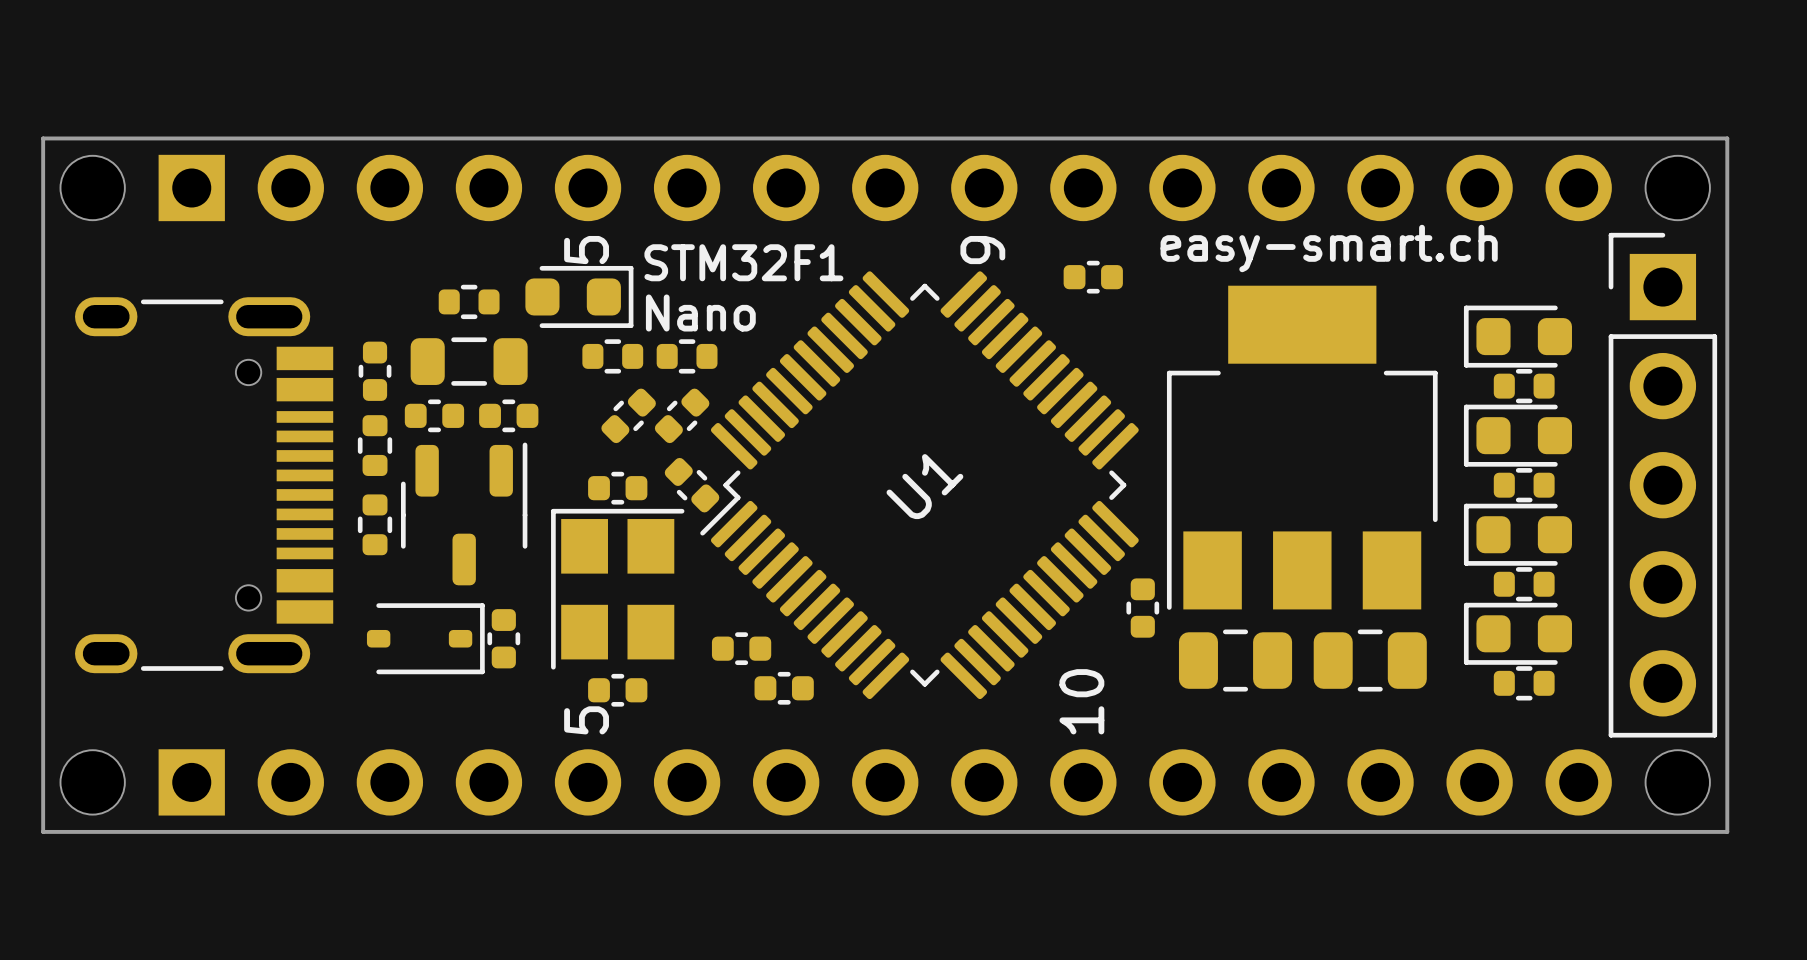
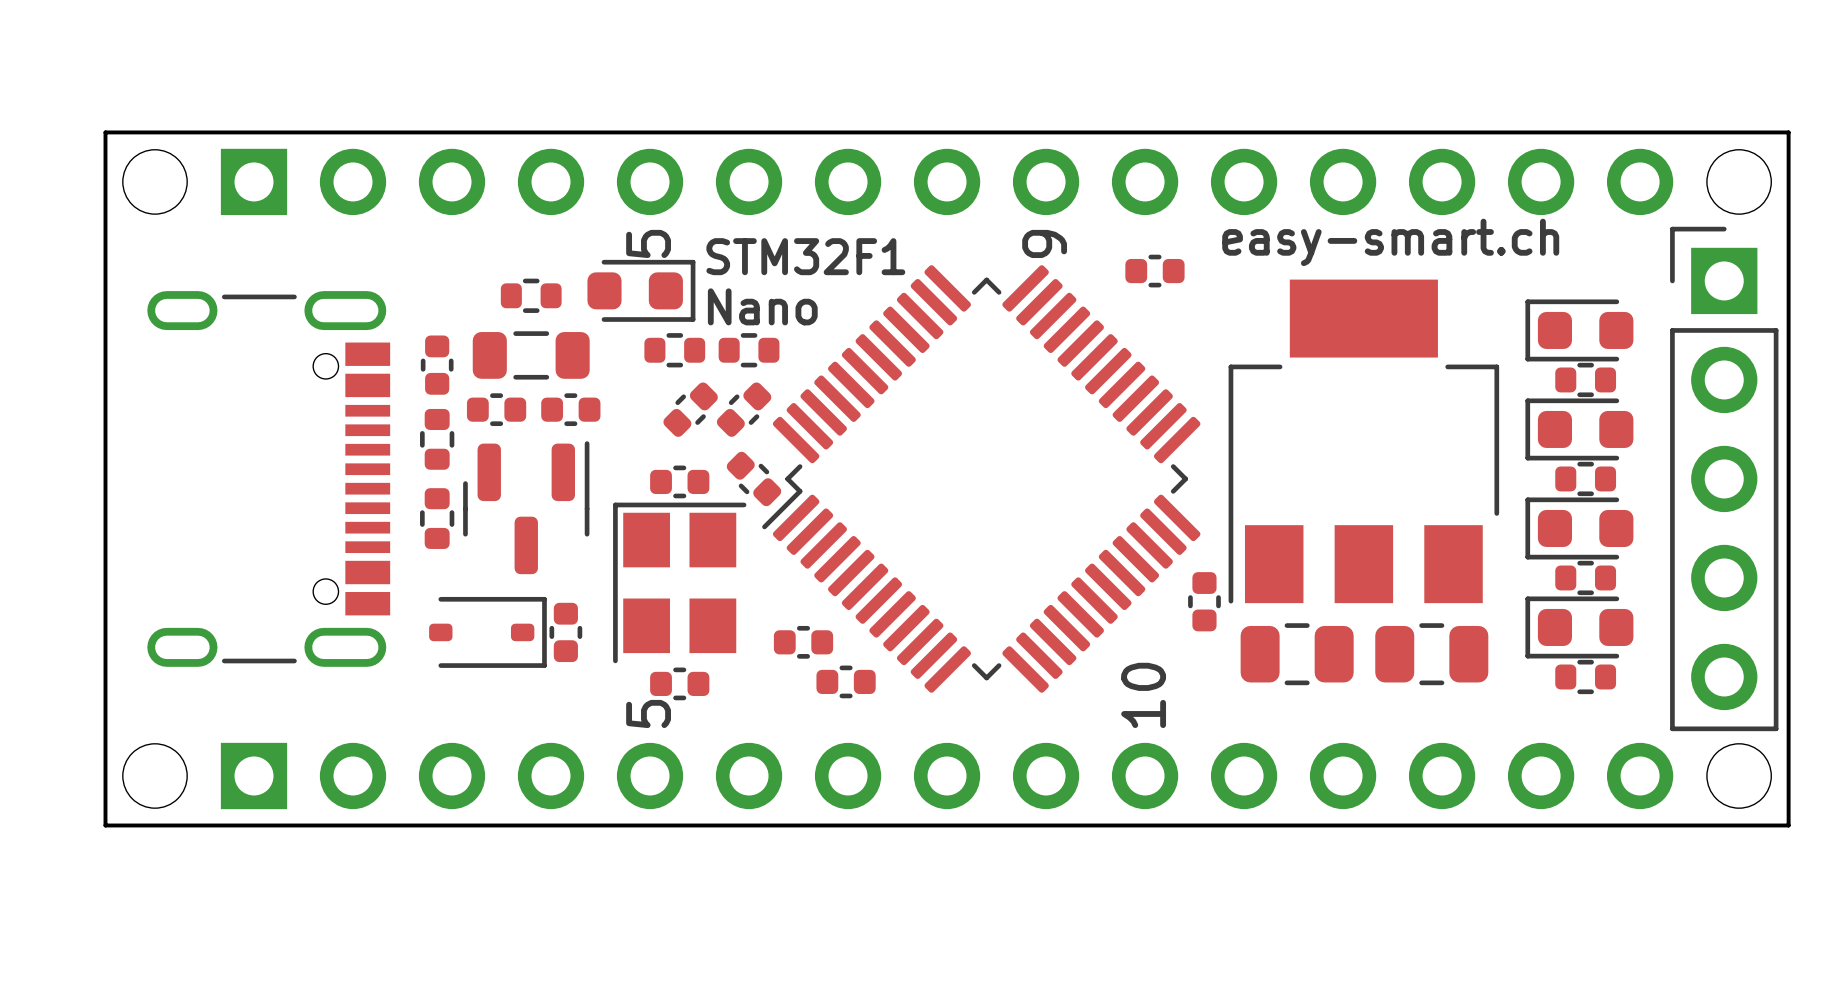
part footprint: [75, 297, 334, 674] -> [147, 291, 391, 667]
part footprint: [401, 442, 528, 586] -> [463, 441, 590, 575]
U1 name: U1 (924, 486) -> none

